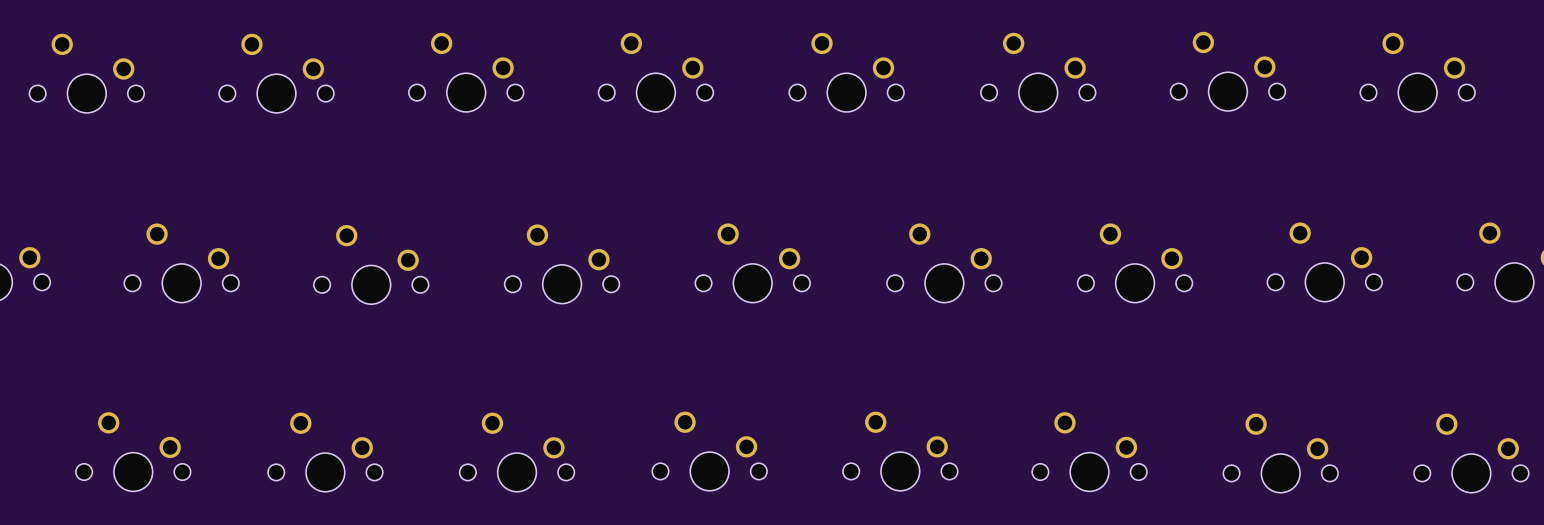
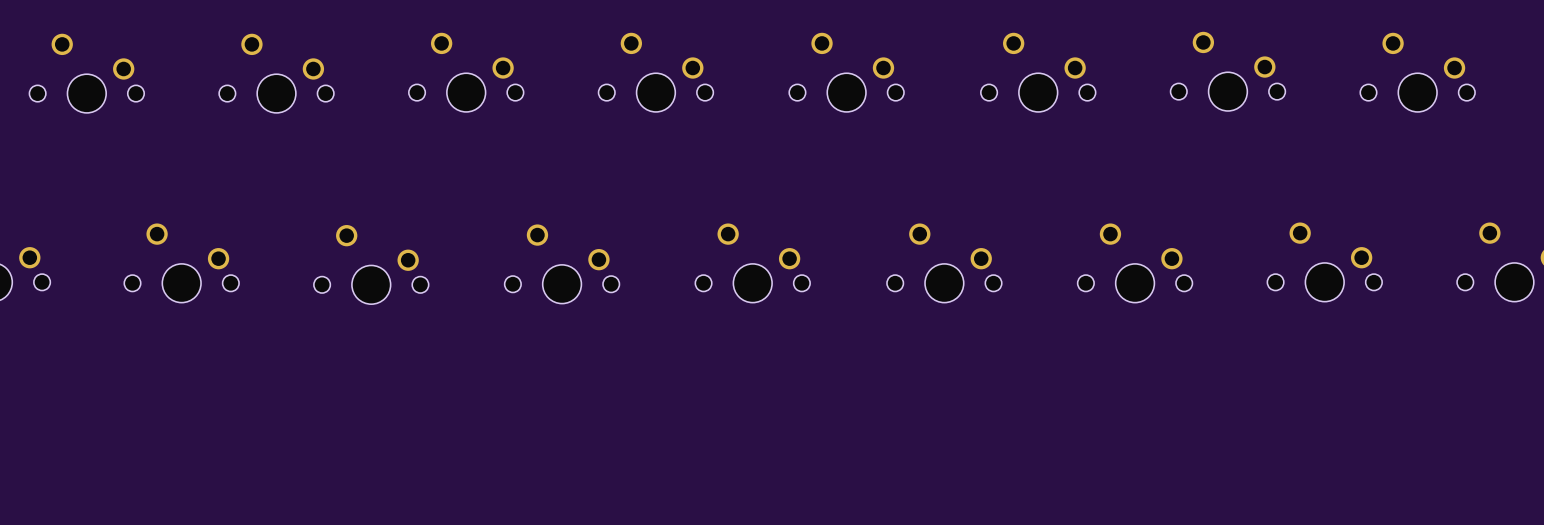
part: (133, 451) -> none
part: (709, 451) -> none
part: (900, 451) -> none
part: (1089, 451) -> none
part: (325, 452) -> none
part: (517, 452) -> none
part: (1280, 453) -> none
part: (1471, 453) -> none

